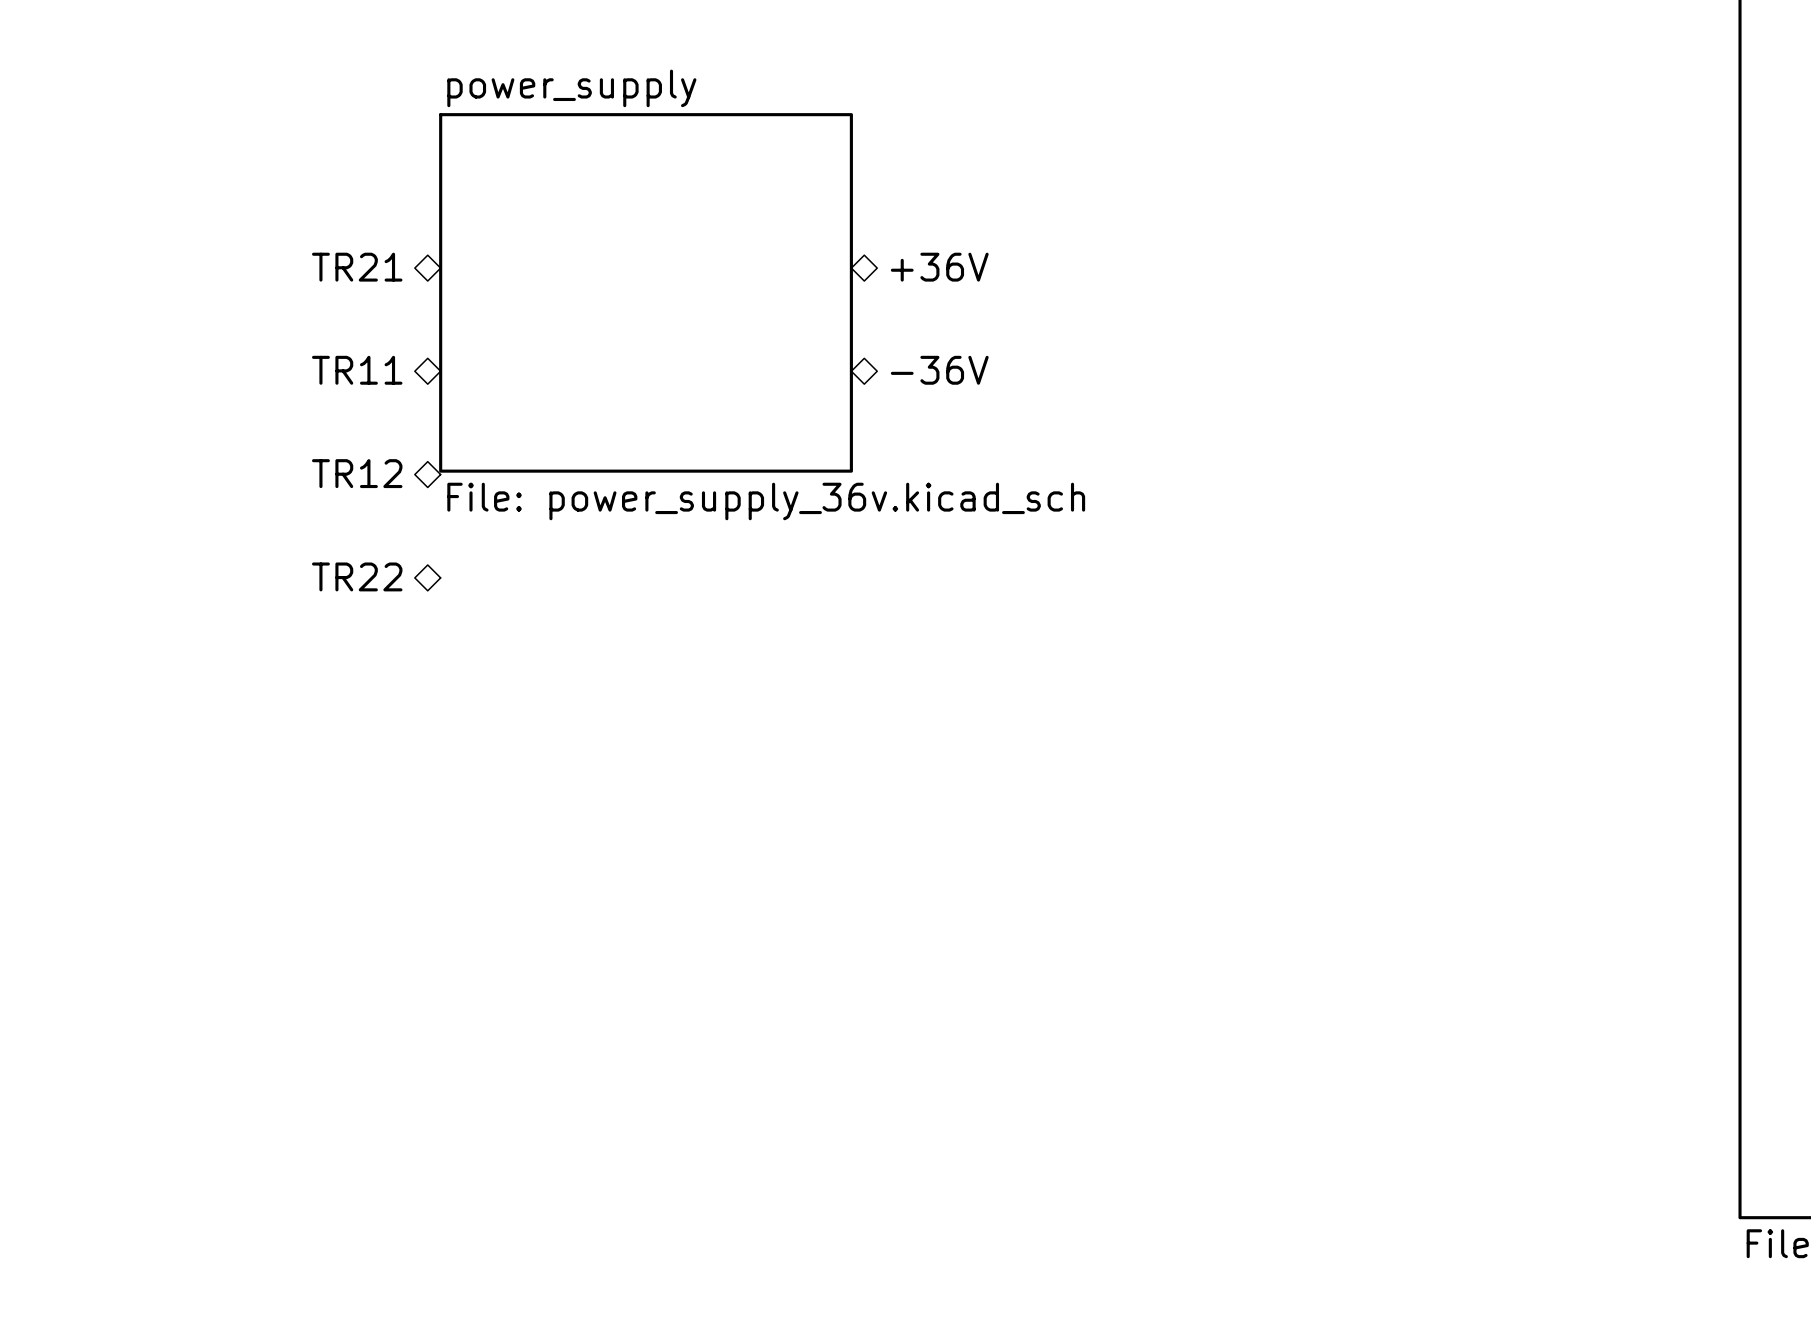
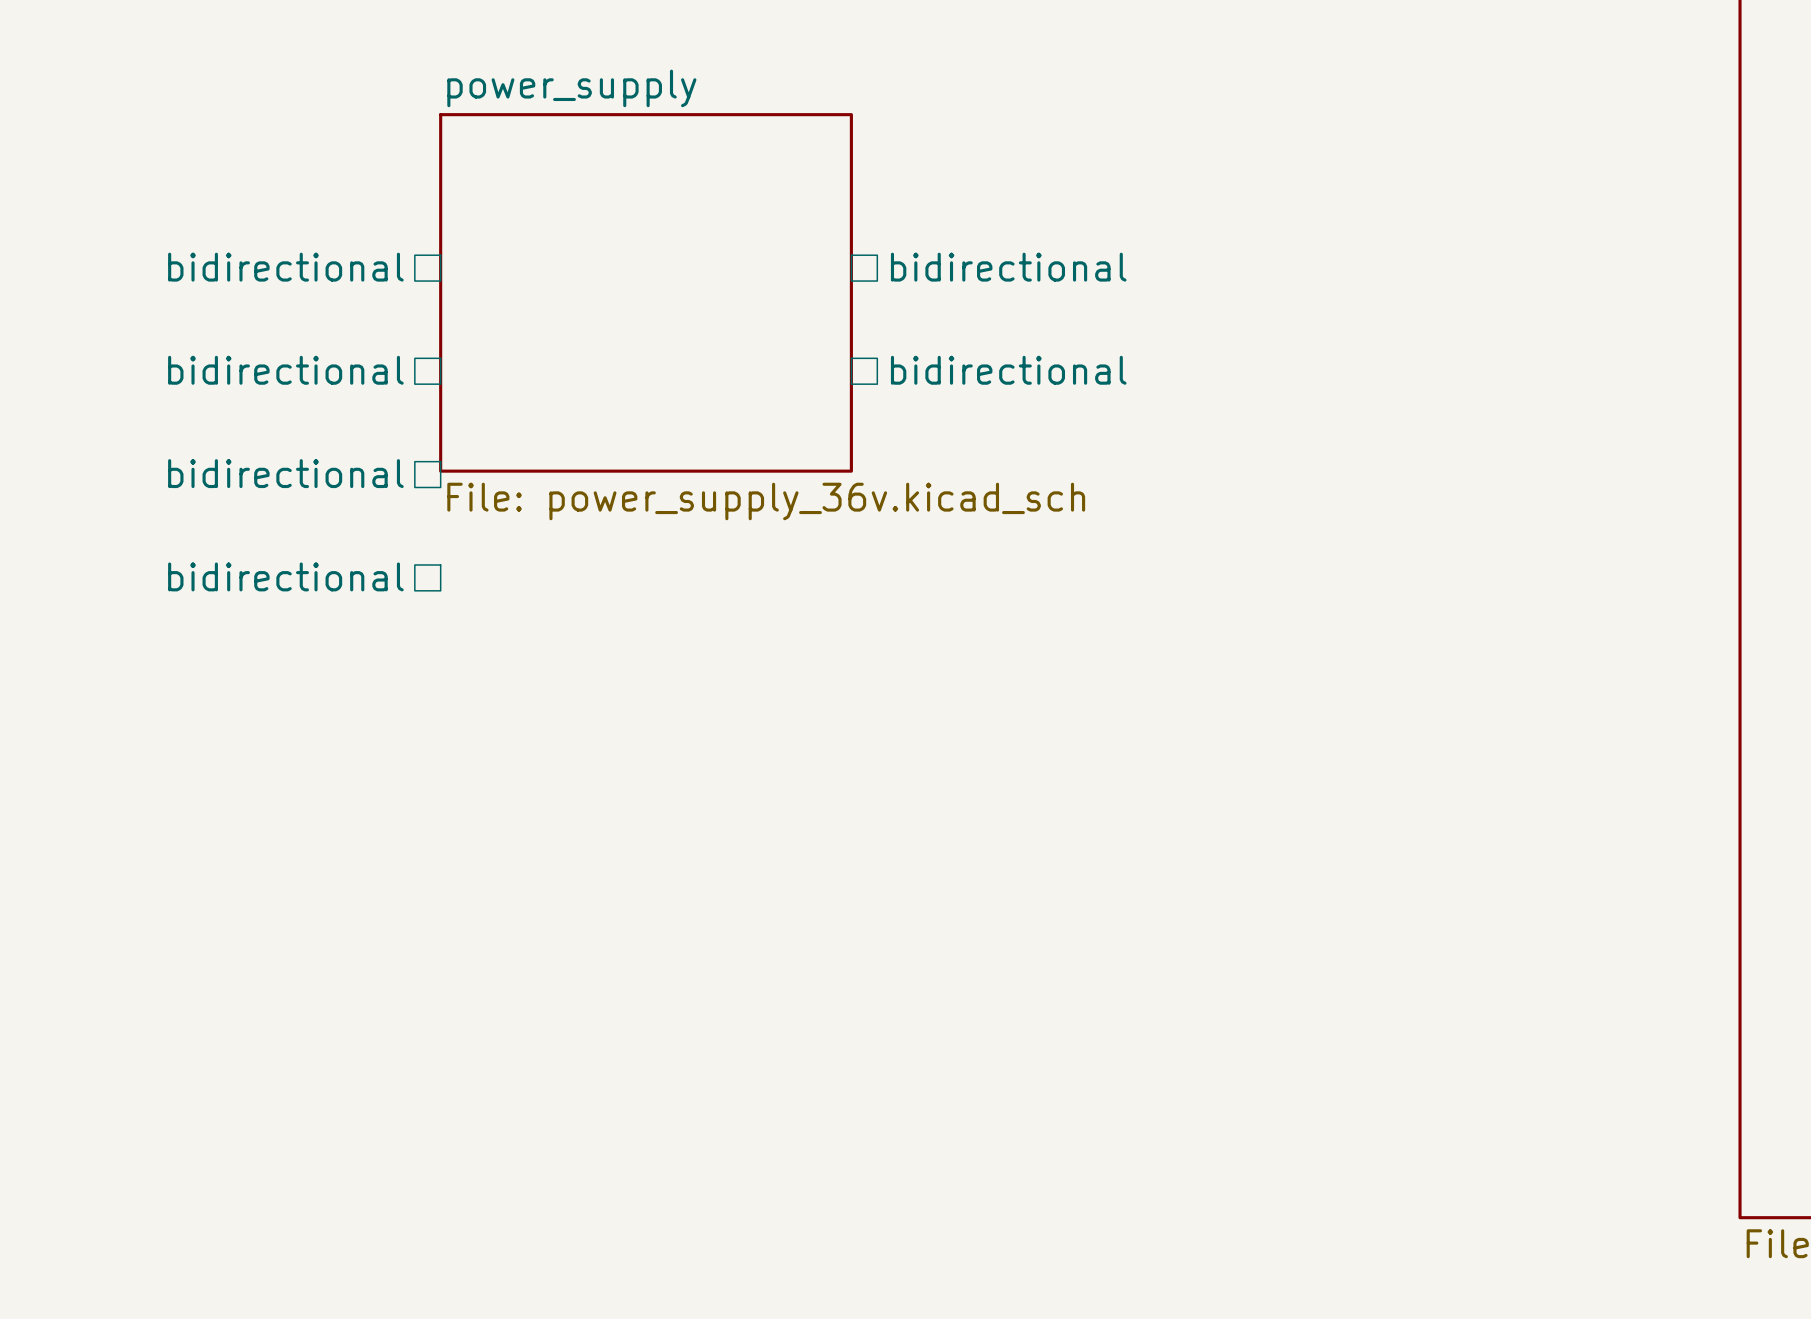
sheet pin shape: bidirectional (357, 267) -> passive (285, 267)
sheet pin: TR21 (357, 267) -> bidirectional (285, 267)
sheet pin shape: bidirectional (939, 267) -> passive (1008, 267)
sheet pin: +36V (939, 267) -> bidirectional (1008, 267)
sheet pin shape: bidirectional (357, 370) -> passive (285, 370)
sheet pin: TR11 (357, 370) -> bidirectional (285, 370)
sheet pin shape: bidirectional (939, 370) -> passive (1008, 370)
sheet pin: -36V (939, 370) -> bidirectional (1008, 370)
sheet pin shape: bidirectional (357, 473) -> passive (285, 473)
sheet pin: TR12 (357, 473) -> bidirectional (285, 473)
sheet pin shape: bidirectional (357, 576) -> passive (285, 576)
sheet pin: TR22 (357, 576) -> bidirectional (285, 576)

